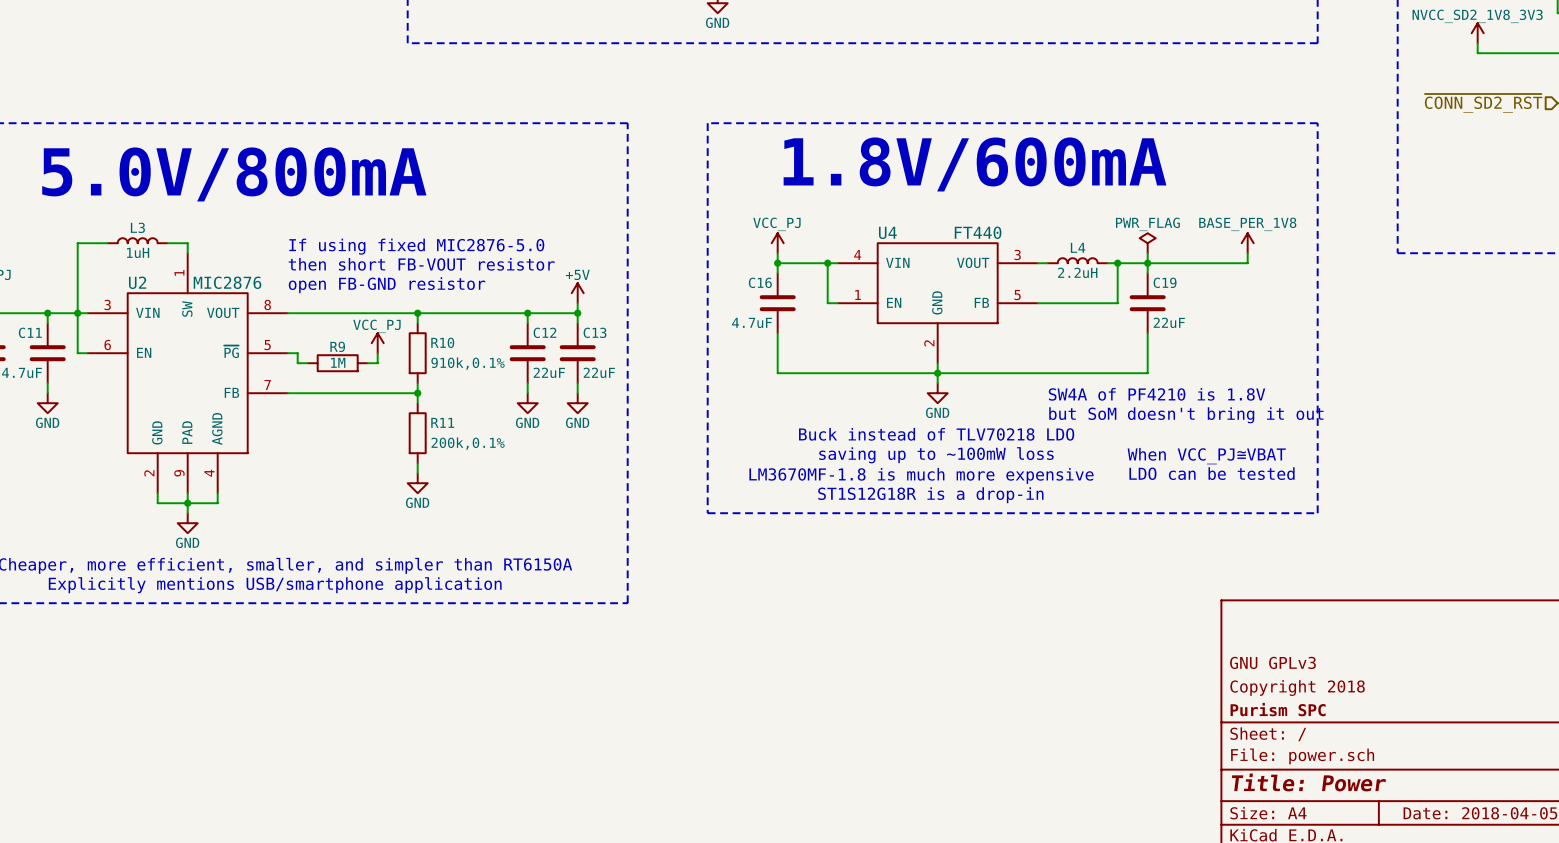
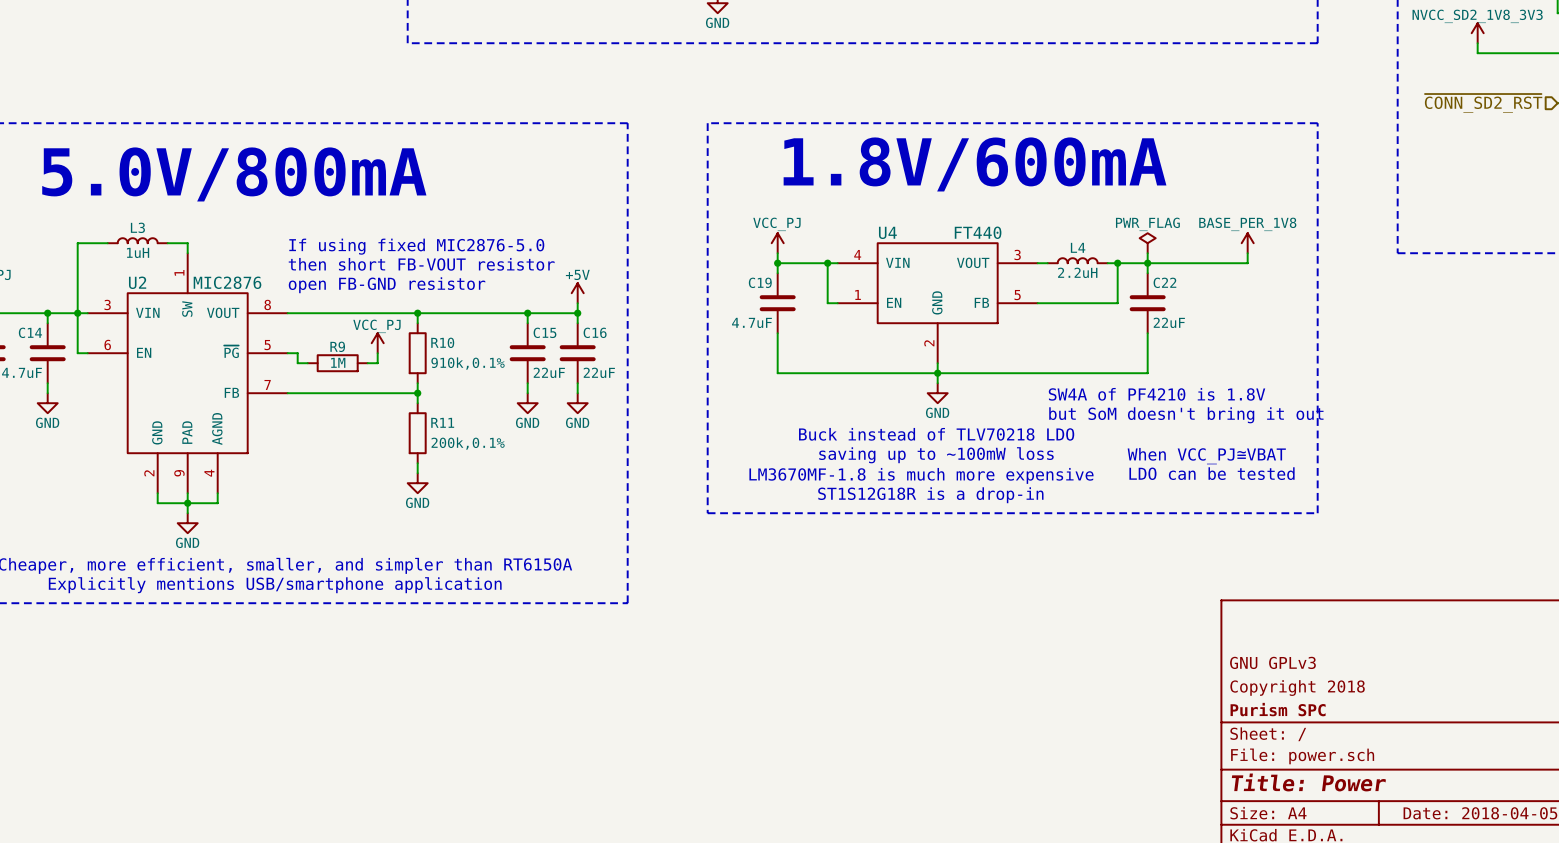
C16 name: C16 (760, 282) -> C19 (760, 282)
C19 name: C19 (1165, 282) -> C22 (1164, 282)
C11 name: C11 (30, 332) -> C14 (30, 332)
C12 name: C12 (544, 332) -> C15 (544, 332)
C13 name: C13 (595, 332) -> C16 (595, 332)

